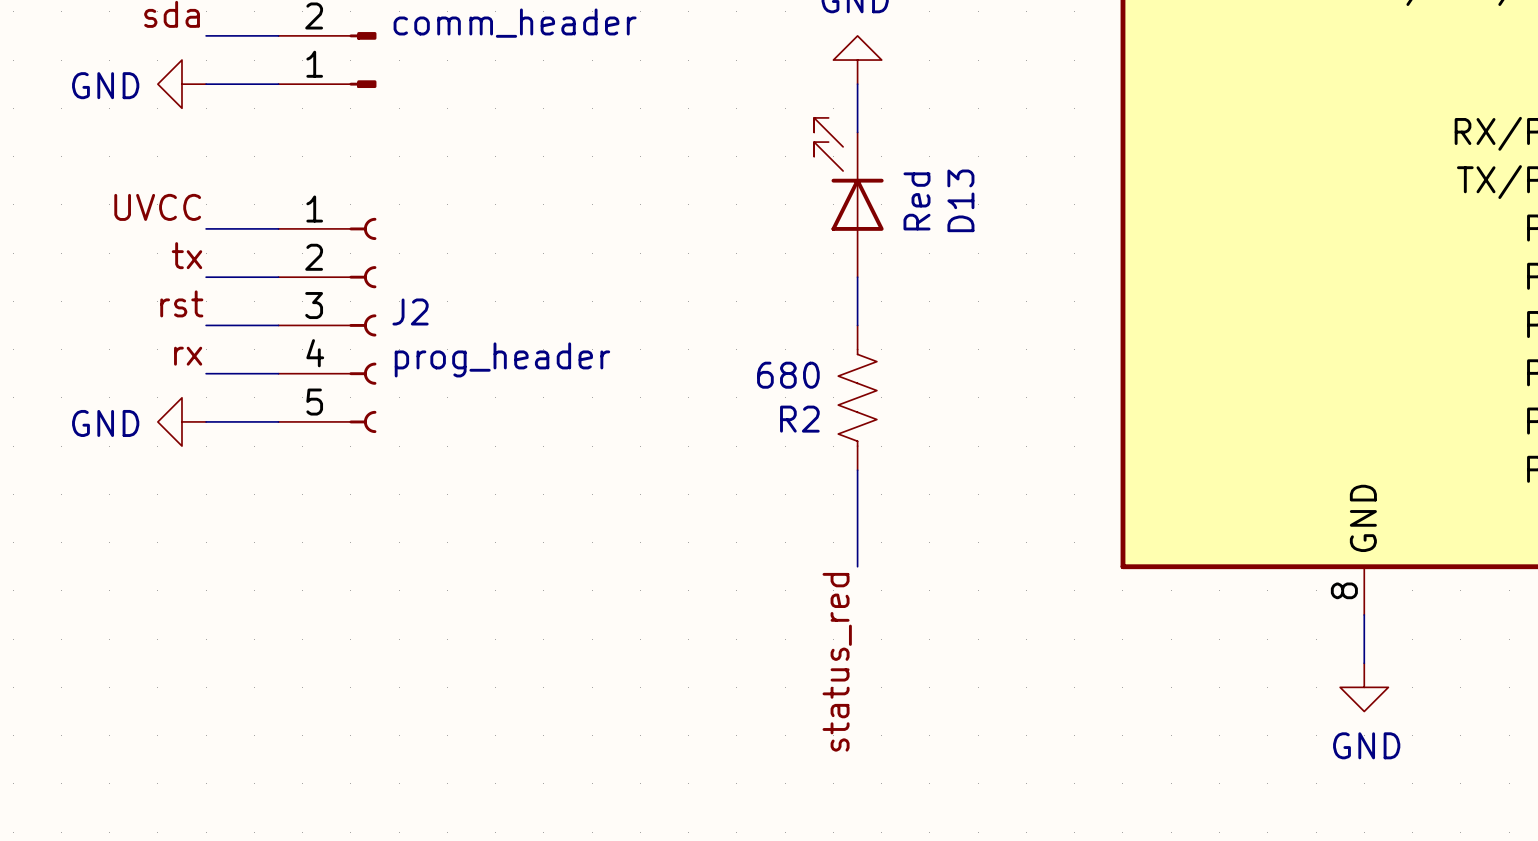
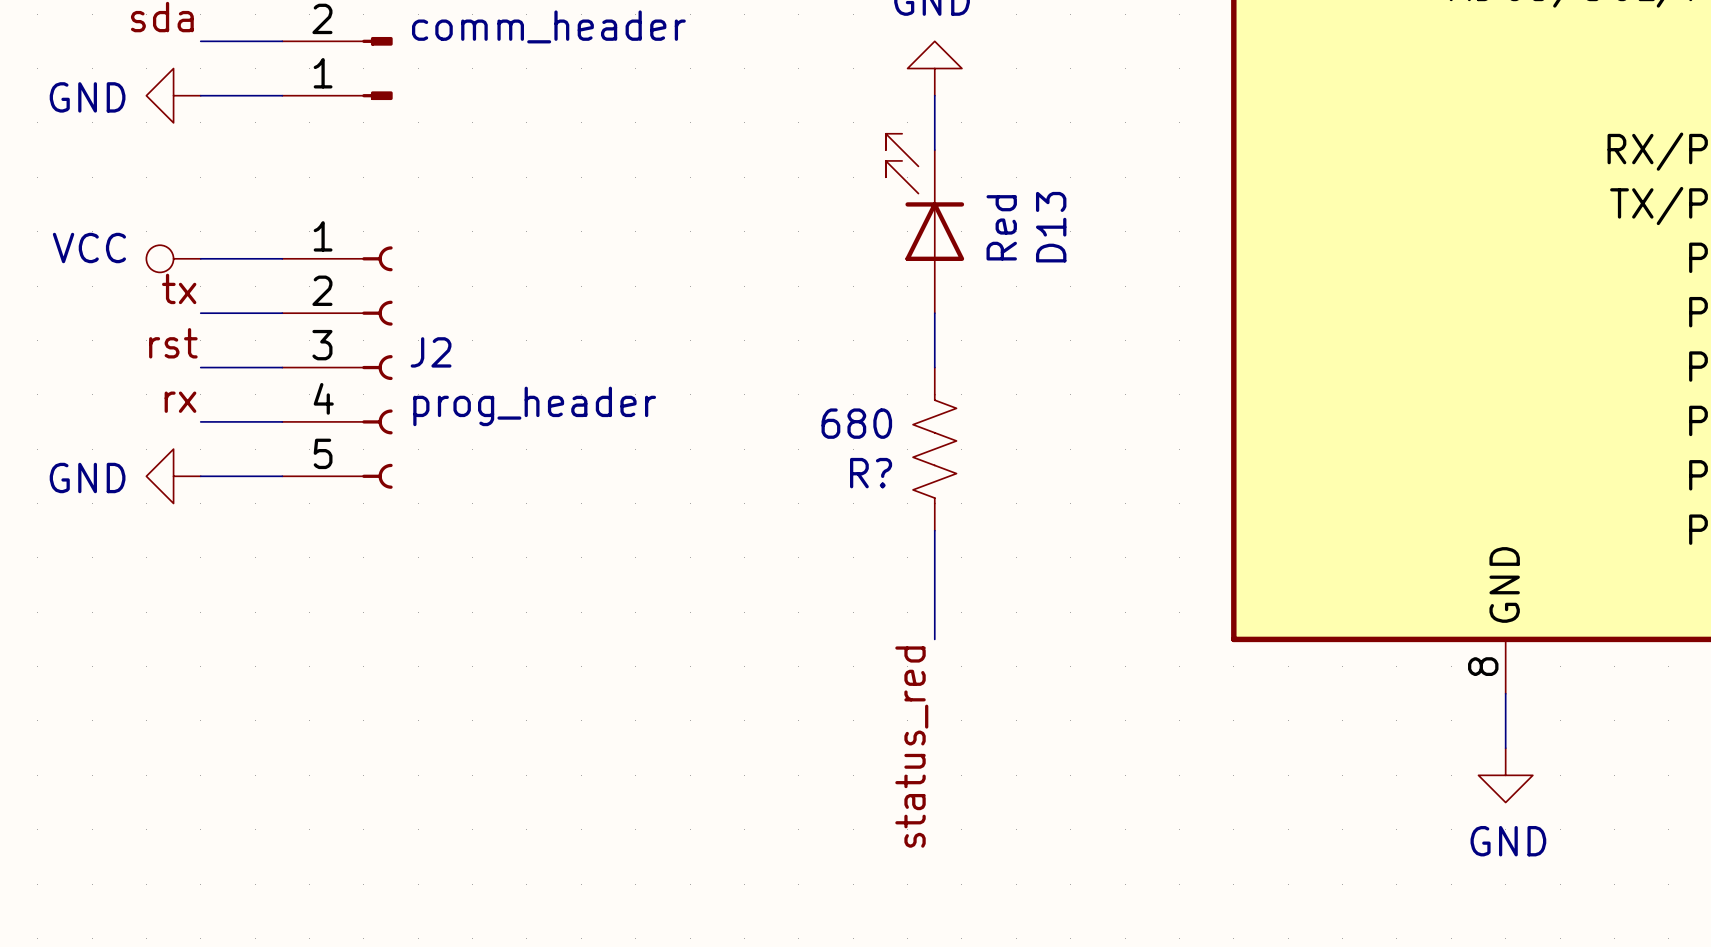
label: UVCC (157, 207) -> none
power symbol: none -> VCC (173, 258)
R2 name: R2 (799, 419) -> R? (871, 473)

